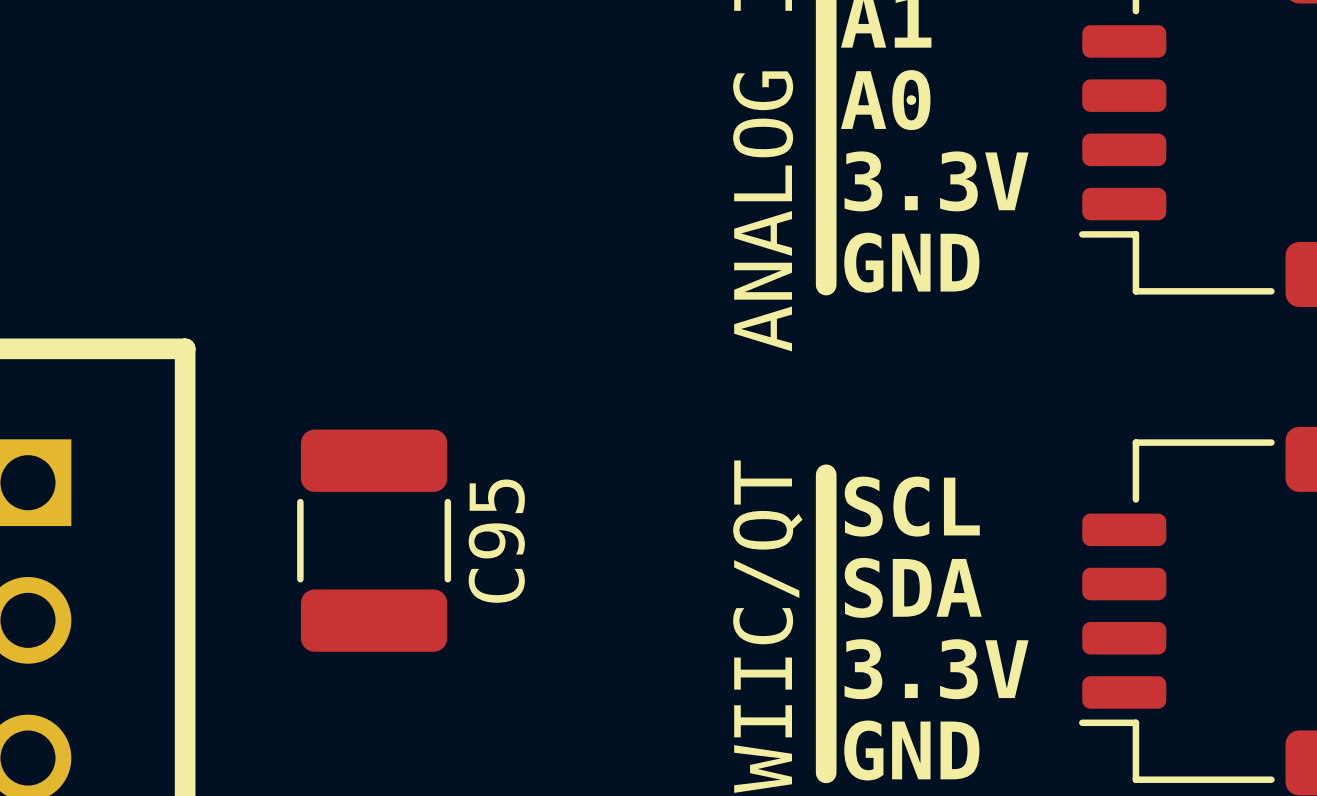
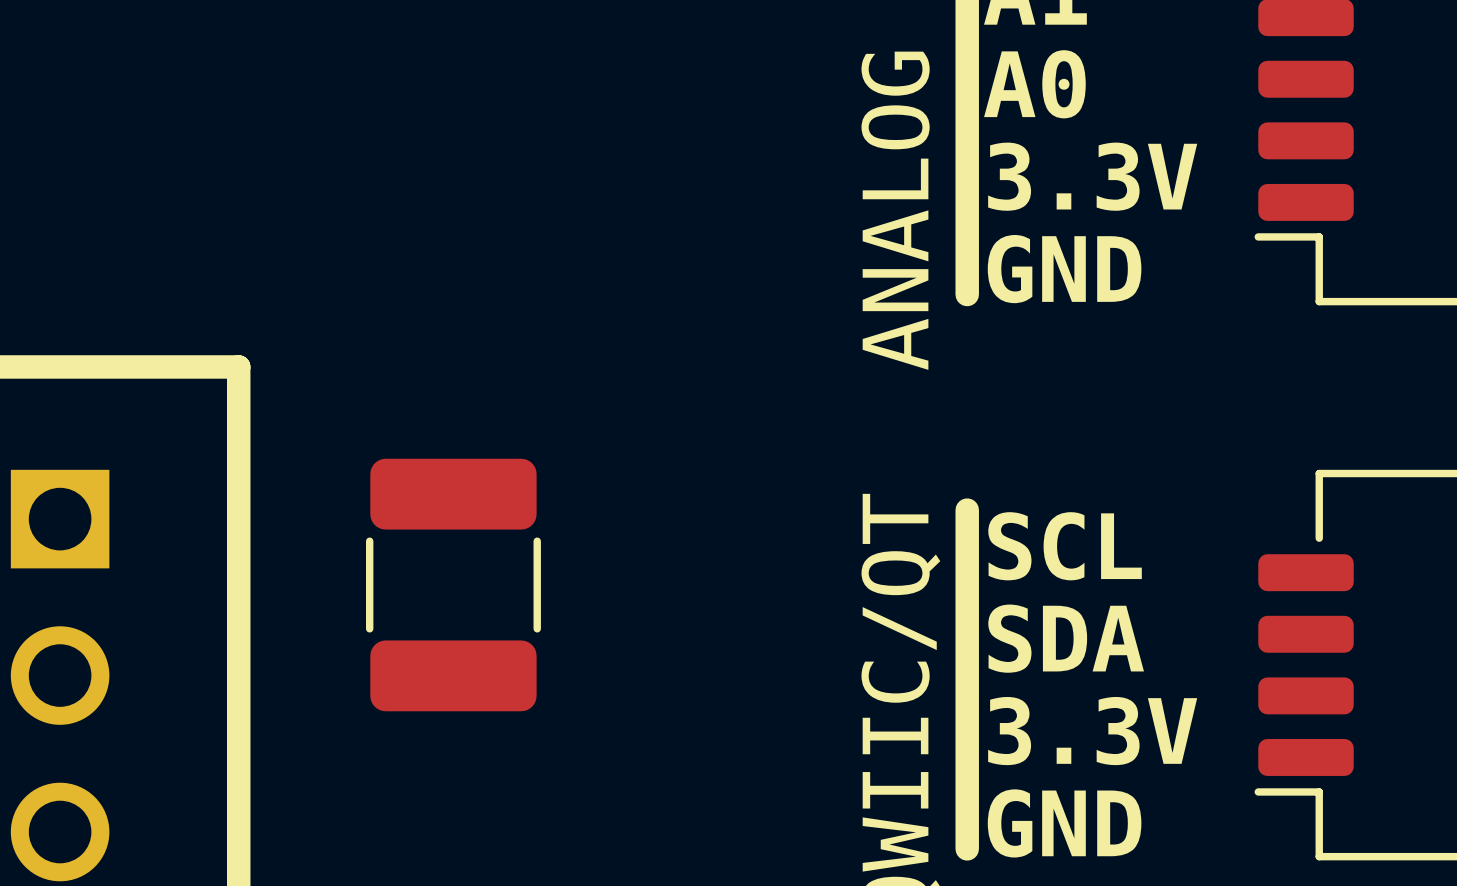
C95 name: C95 (496, 541) -> none

